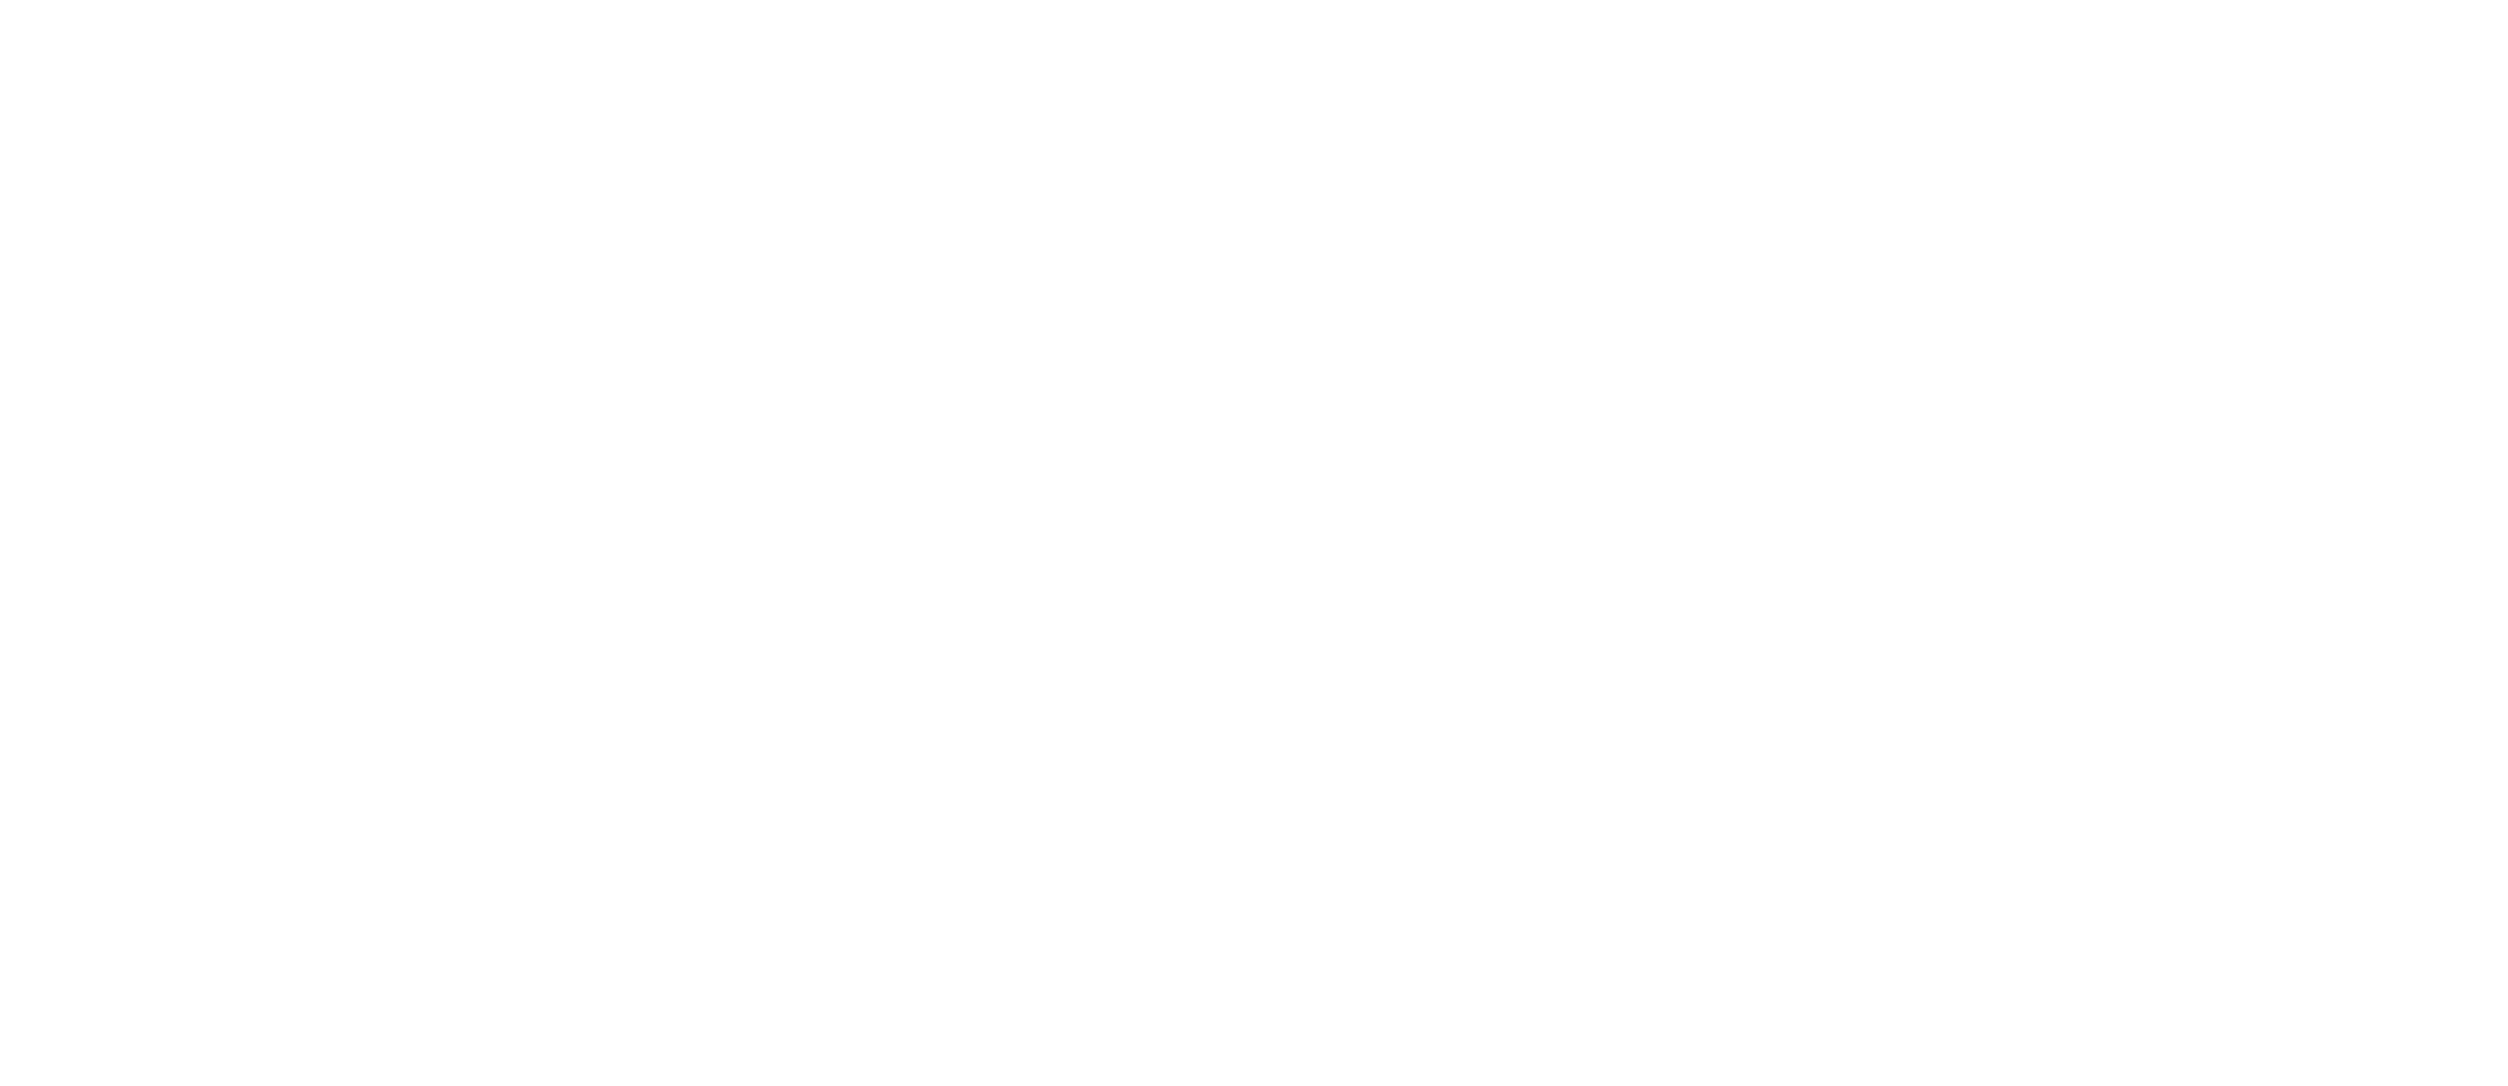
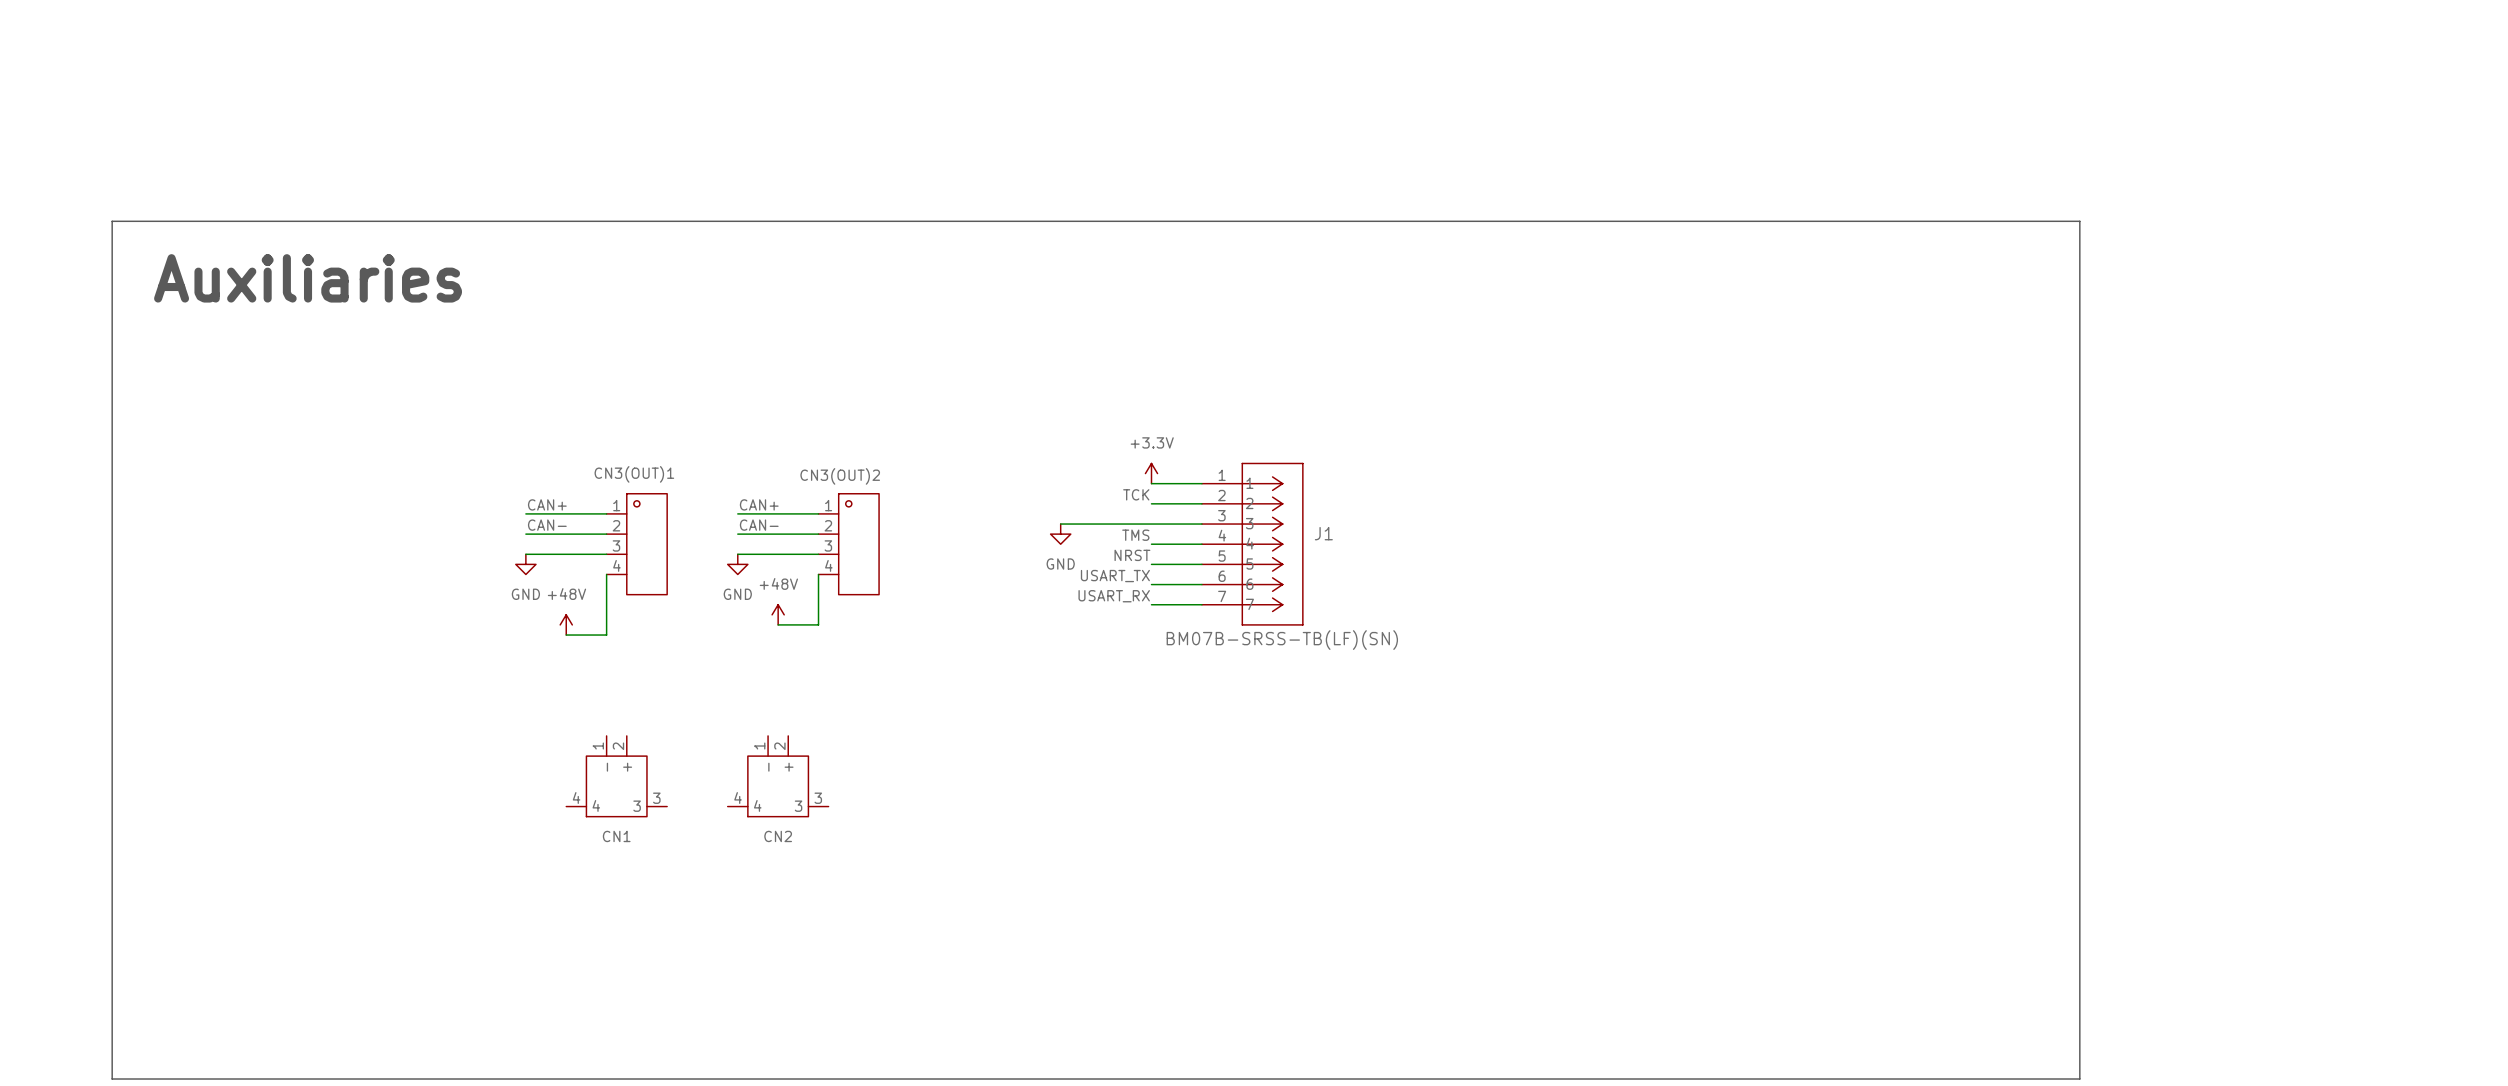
line: none -> (112, 221) (2079, 221) (2079, 1079) (112, 1079) (112, 221)
text: none -> Auxiliaries (308, 278)
power symbol: none -> +3.3V (1151, 473)
wire: none -> (1151, 483) (1201, 483)
label: none -> TCK (1136, 494)
wire: none -> (1151, 503) (1201, 503)
label: none -> CAN+ (547, 504)
label: none -> CAN+ (759, 504)
wire: none -> (525, 513) (606, 513)
wire: none -> (737, 513) (818, 513)
wire: none -> (1060, 524) (1201, 524)
label: none -> CAN- (547, 525)
label: none -> CAN- (759, 525)
wire: none -> (525, 534) (606, 534)
wire: none -> (737, 534) (818, 534)
power symbol: none -> GND (1060, 534)
label: none -> TMS (1135, 535)
CN3(OUT)1: none -> (636, 544)
CN3(OUT)2: none -> (848, 544)
wire: none -> (1151, 544) (1201, 544)
J1: none -> BM07B-SRSS-TB(LF)(SN) (1252, 544)
wire: none -> (525, 554) (606, 554)
wire: none -> (737, 554) (818, 554)
label: none -> NRST (1132, 555)
power symbol: none -> GND (525, 564)
power symbol: none -> GND (737, 564)
wire: none -> (1151, 564) (1201, 564)
wire: none -> (606, 574) (606, 635) (566, 635)
wire: none -> (818, 574) (818, 624) (778, 624)
label: none -> USART_TX (1115, 576)
wire: none -> (1151, 584) (1201, 584)
label: none -> USART_RX (1114, 596)
wire: none -> (1151, 604) (1201, 604)
power symbol: none -> +48V (778, 614)
power symbol: none -> +48V (566, 624)
CN1: none -> (616, 776)
CN2: none -> (778, 776)

